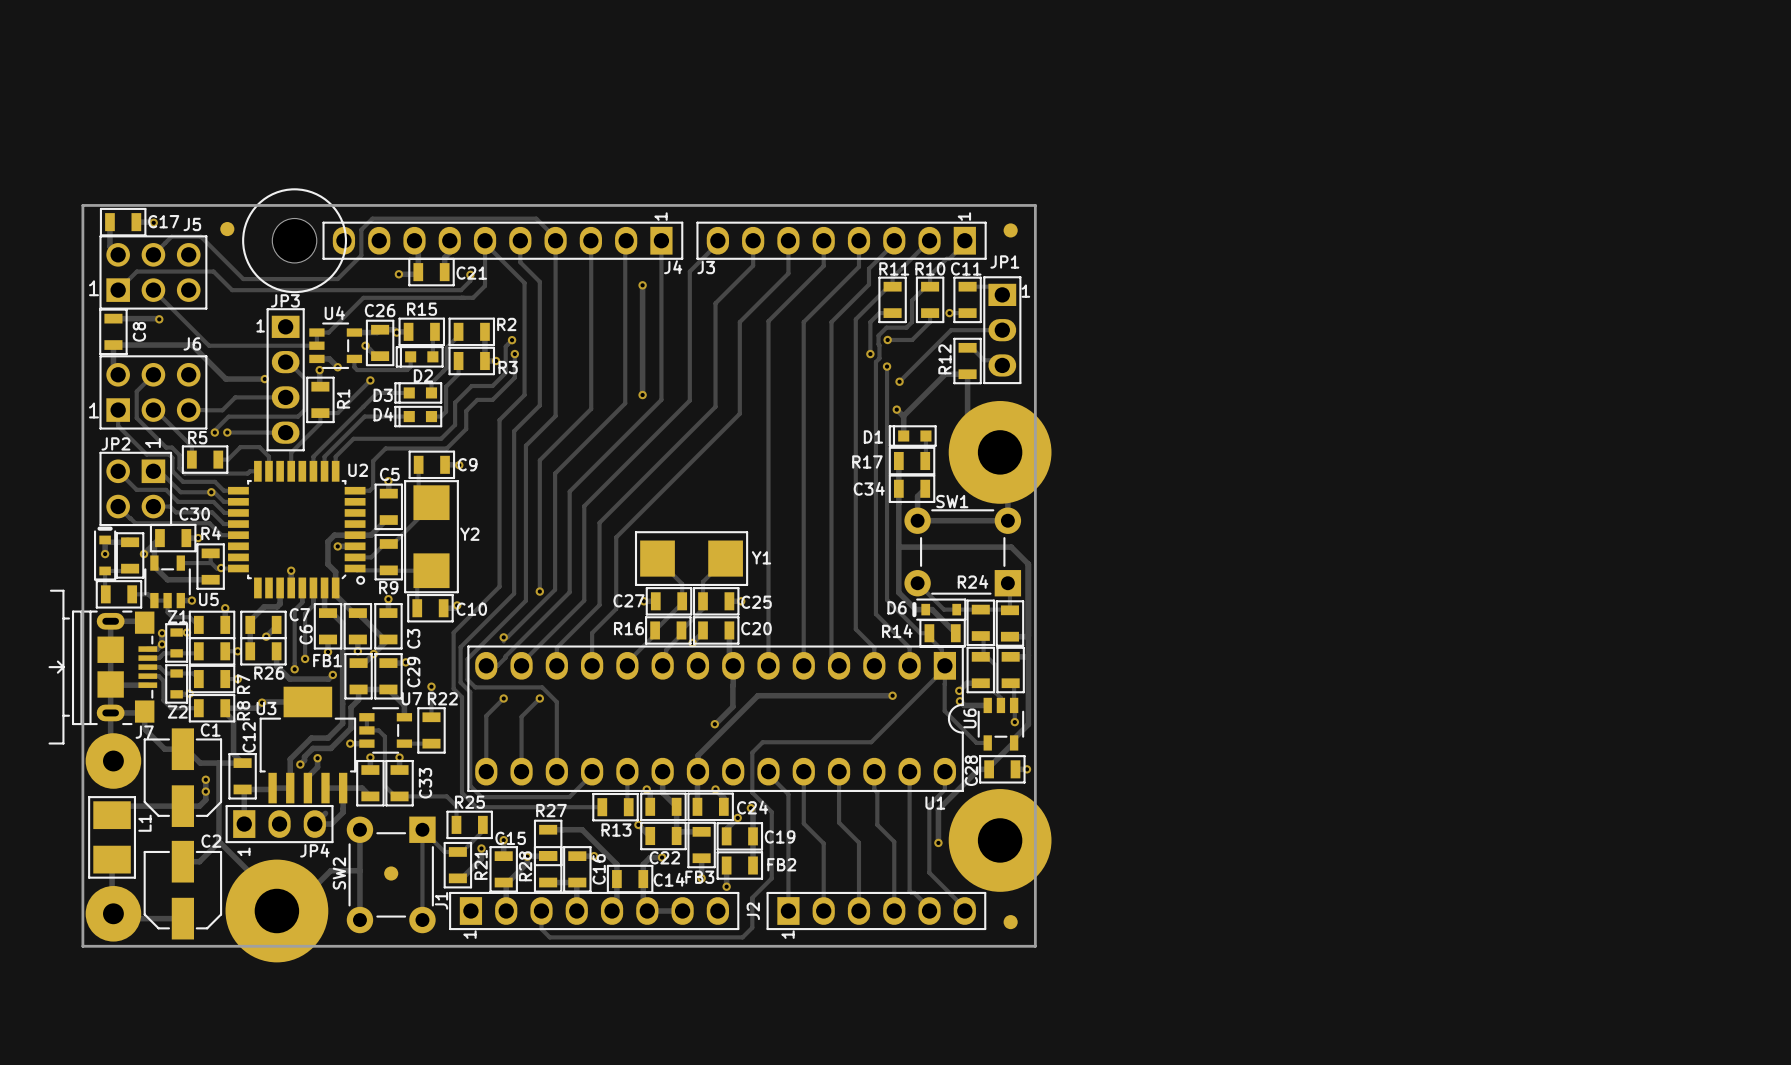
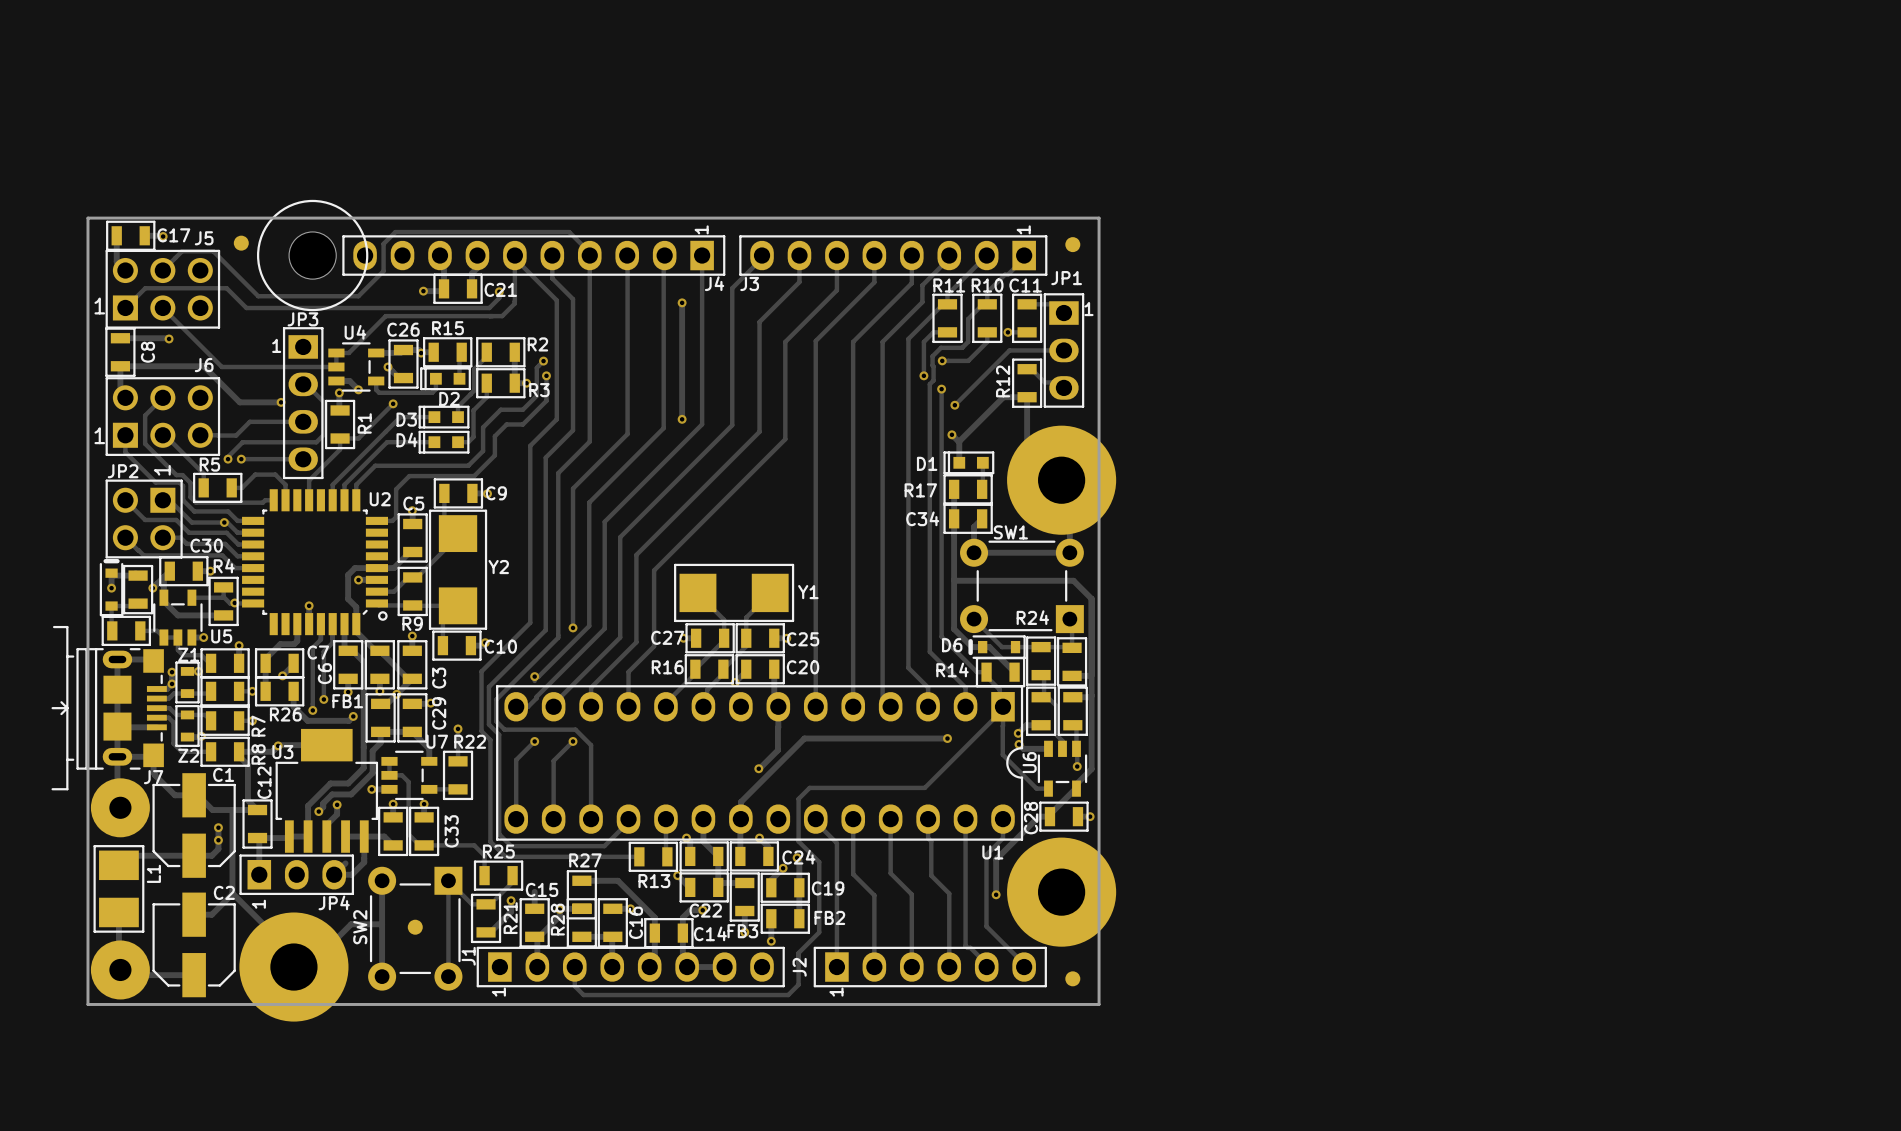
via: (503, 840) -> none

